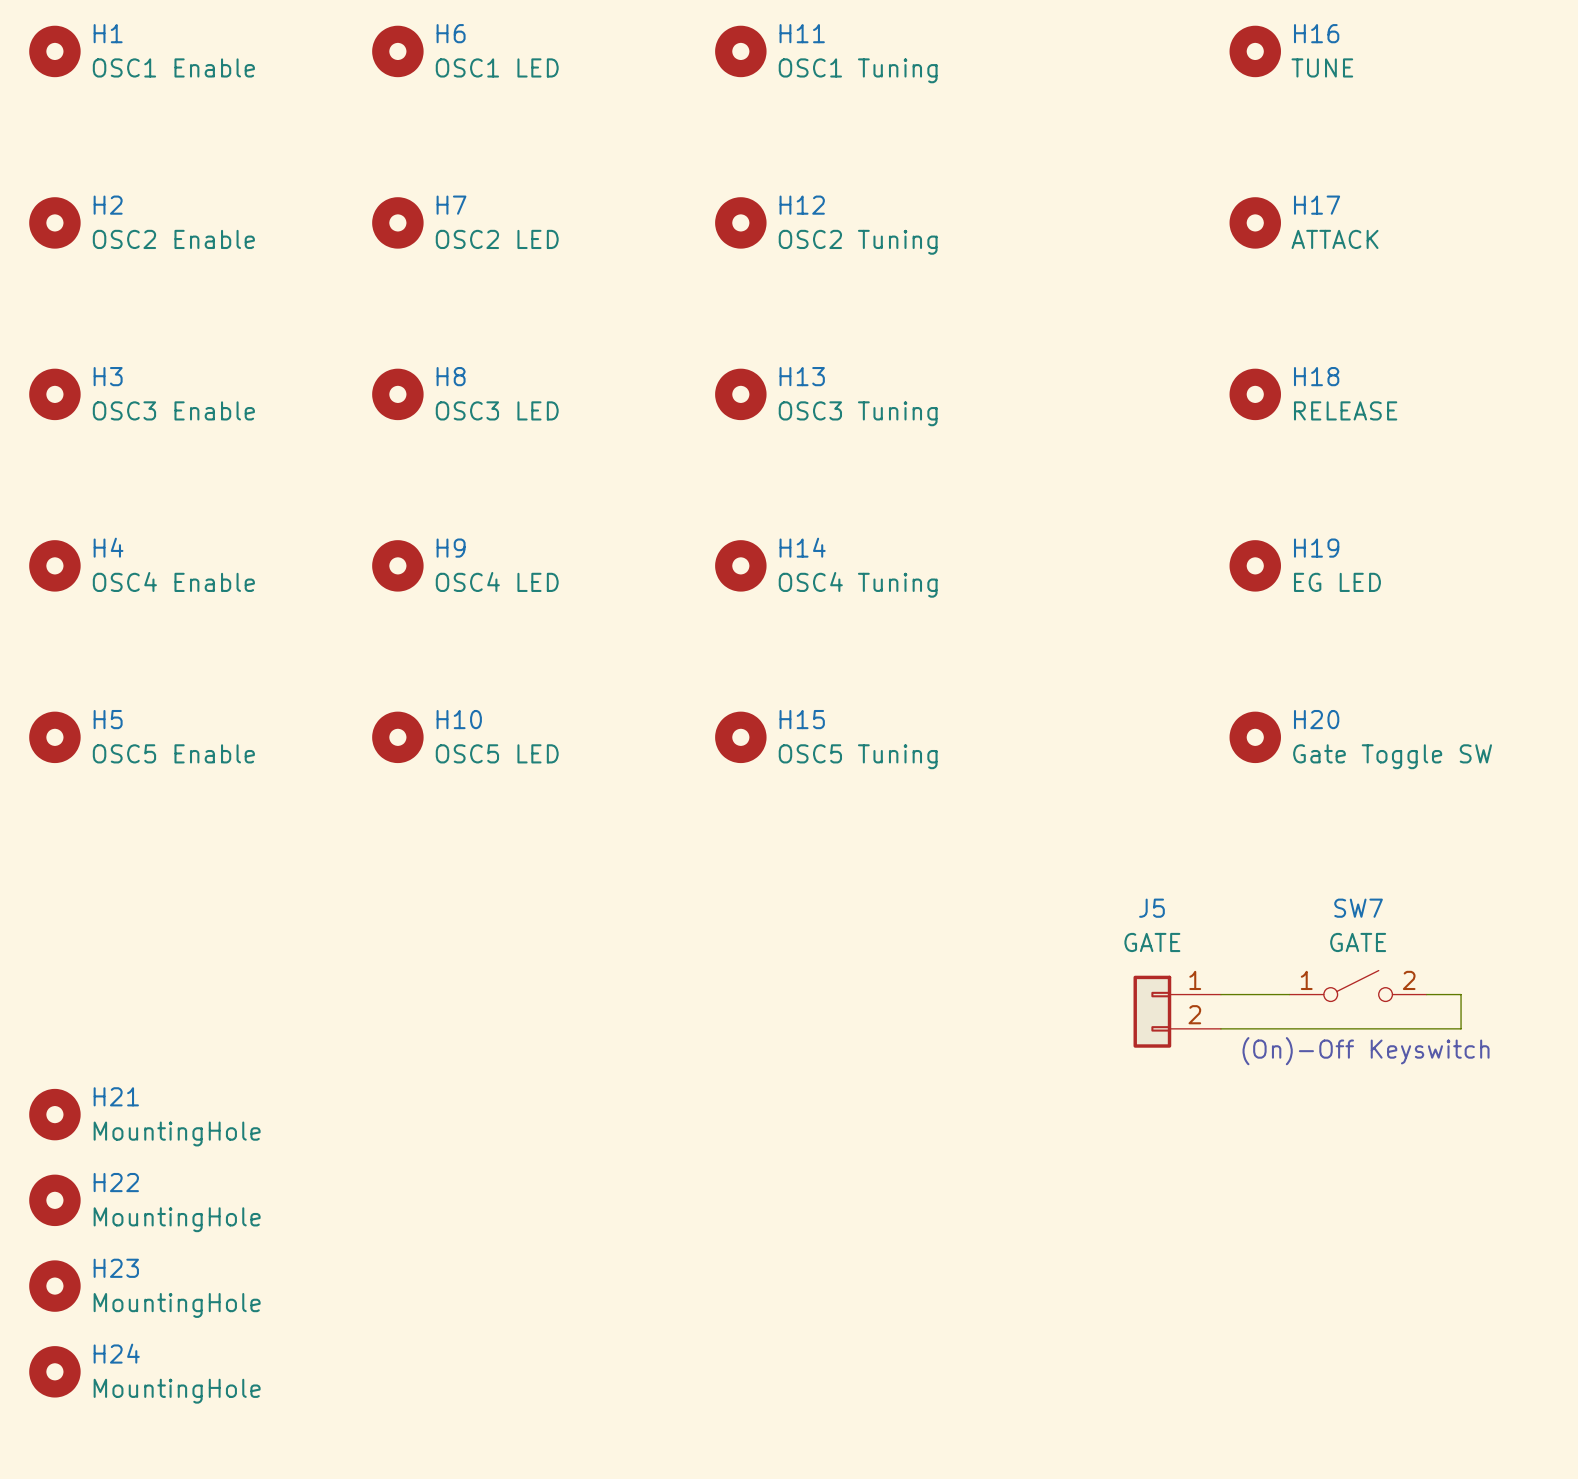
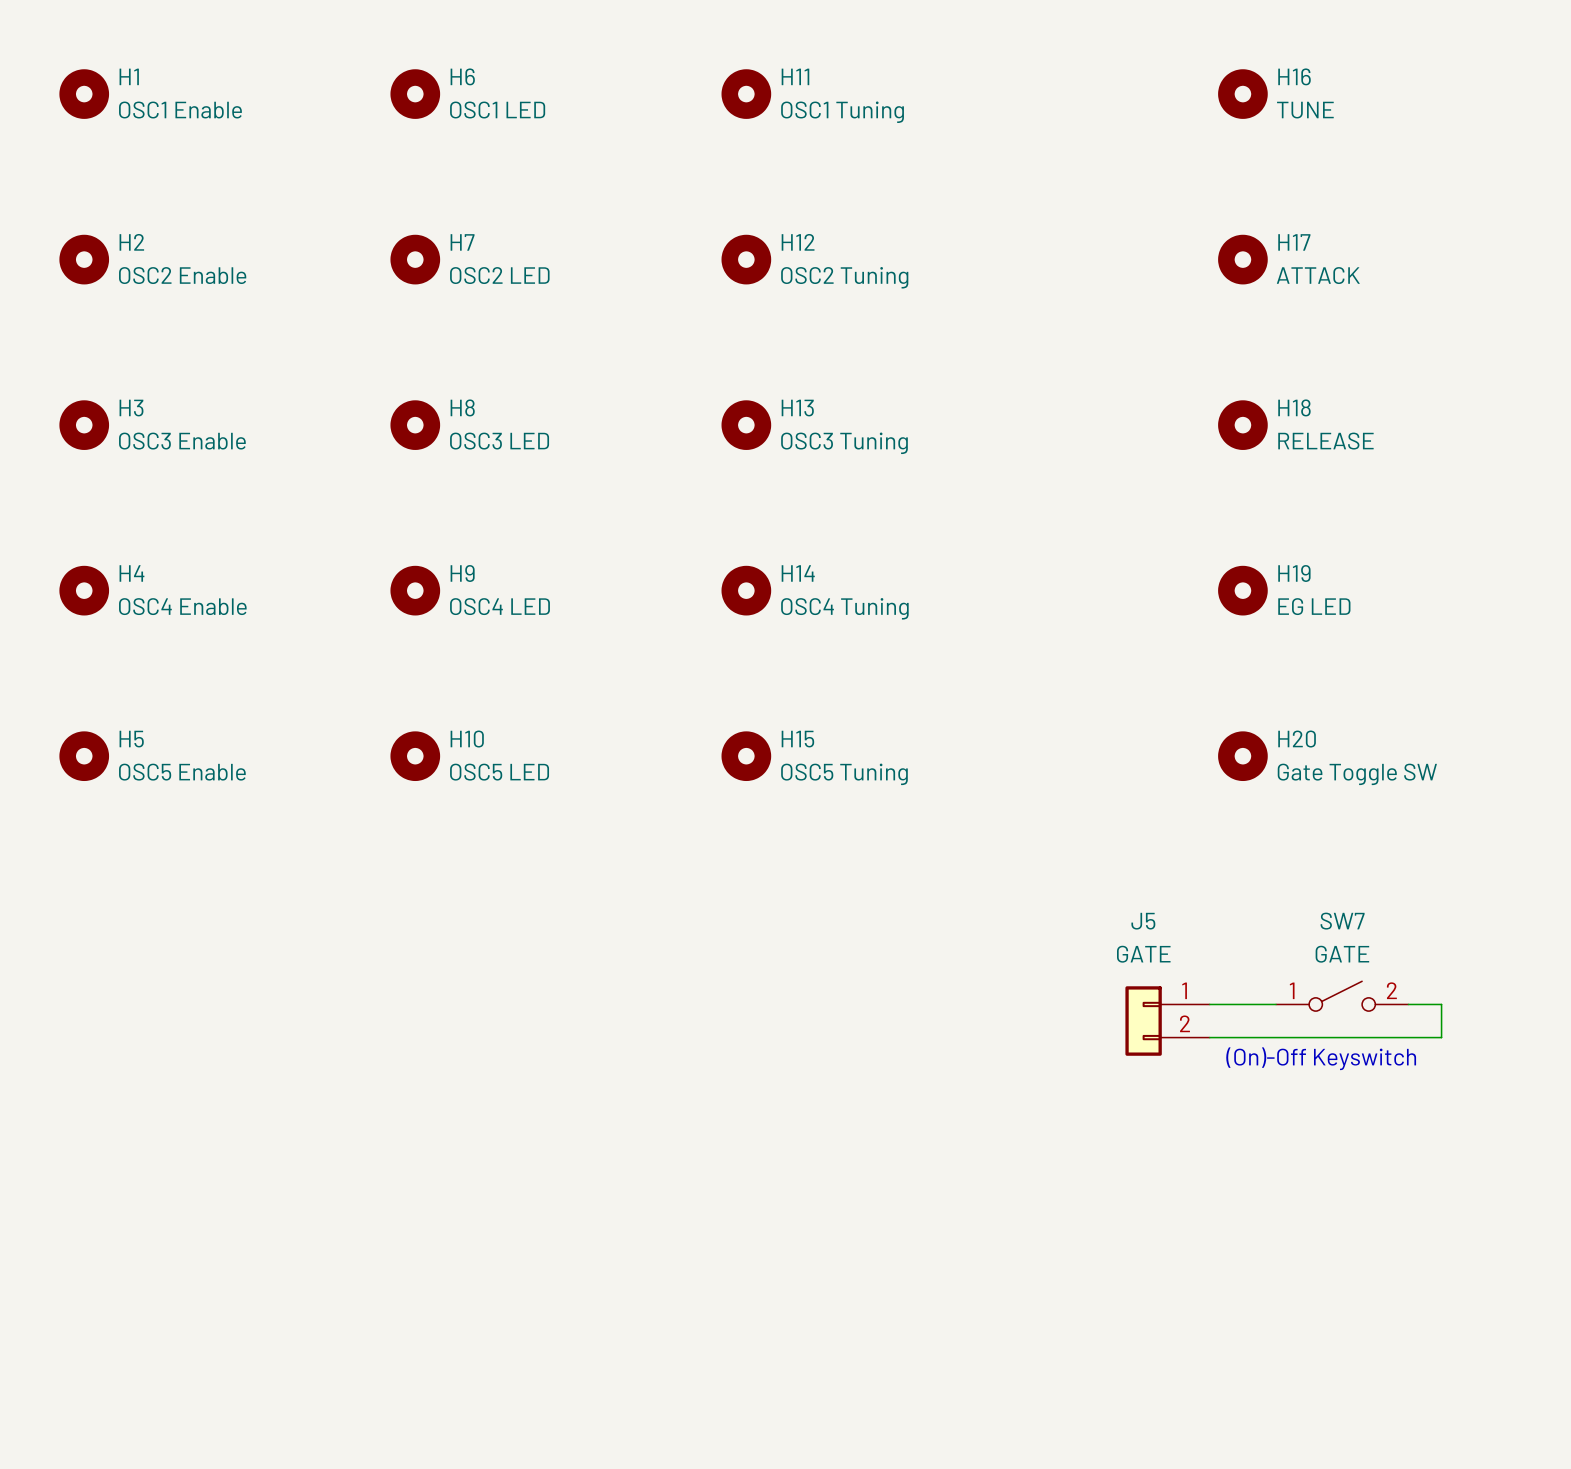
H21: MountingHole (54, 1114) -> none
H22: MountingHole (54, 1200) -> none
H23: MountingHole (54, 1286) -> none
H24: MountingHole (54, 1371) -> none

